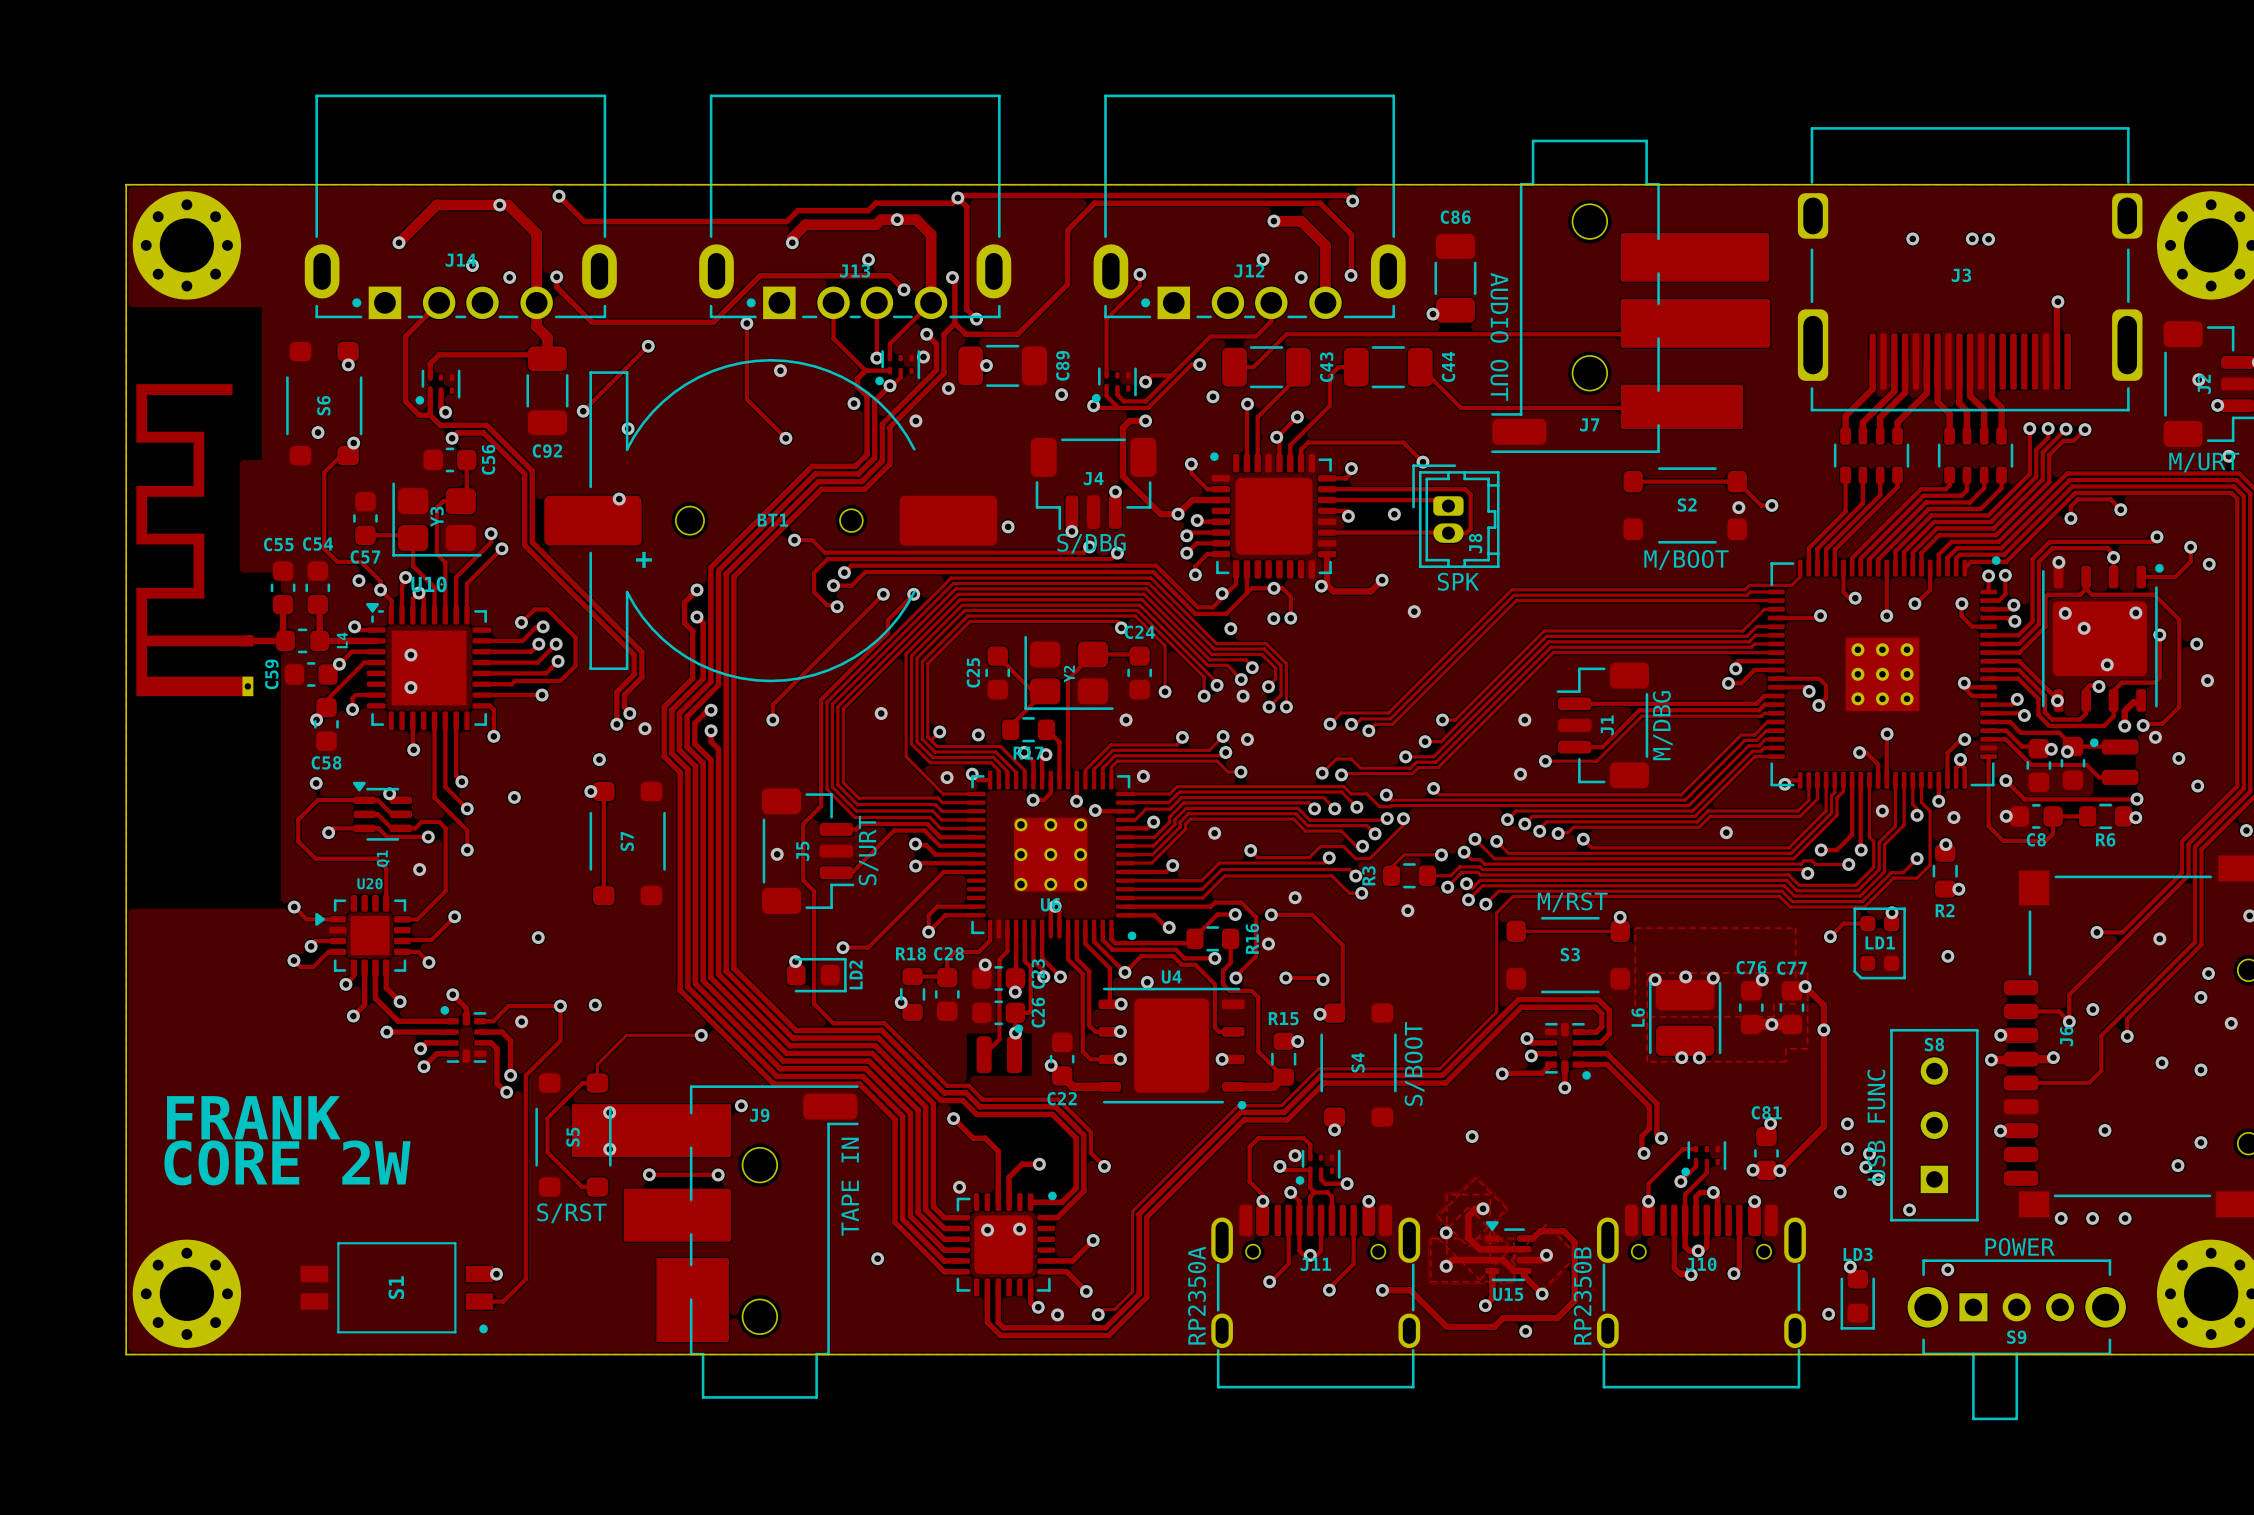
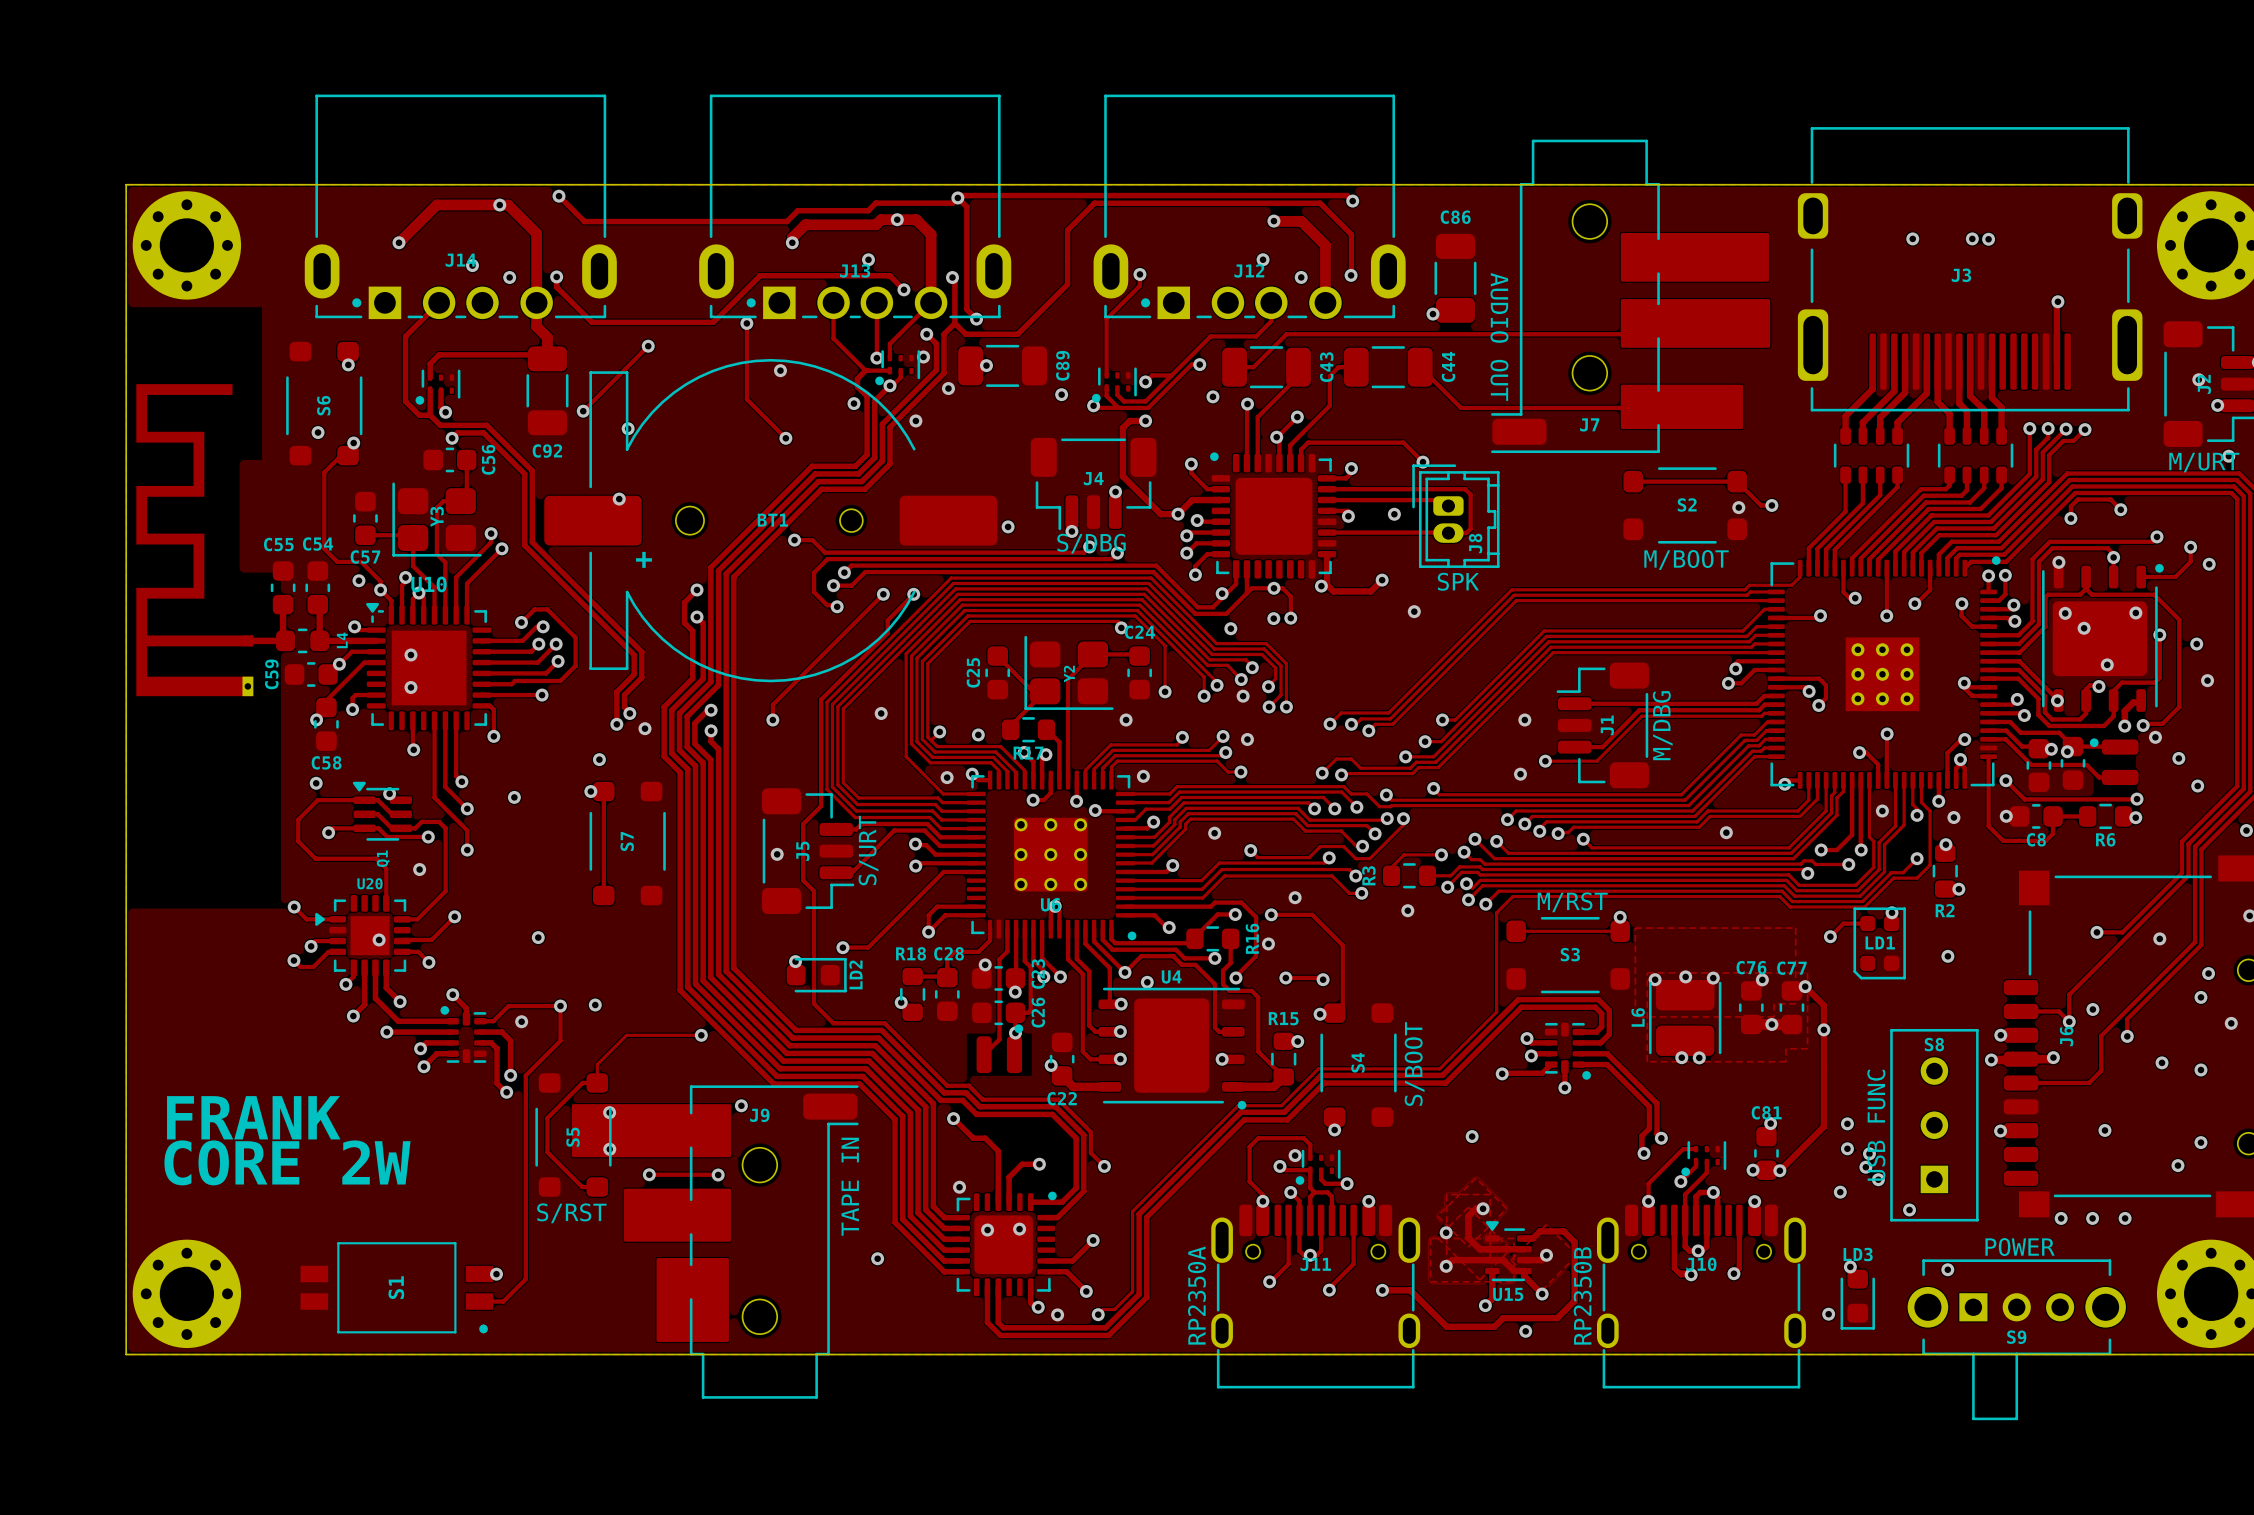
via: none -> (379, 939)

